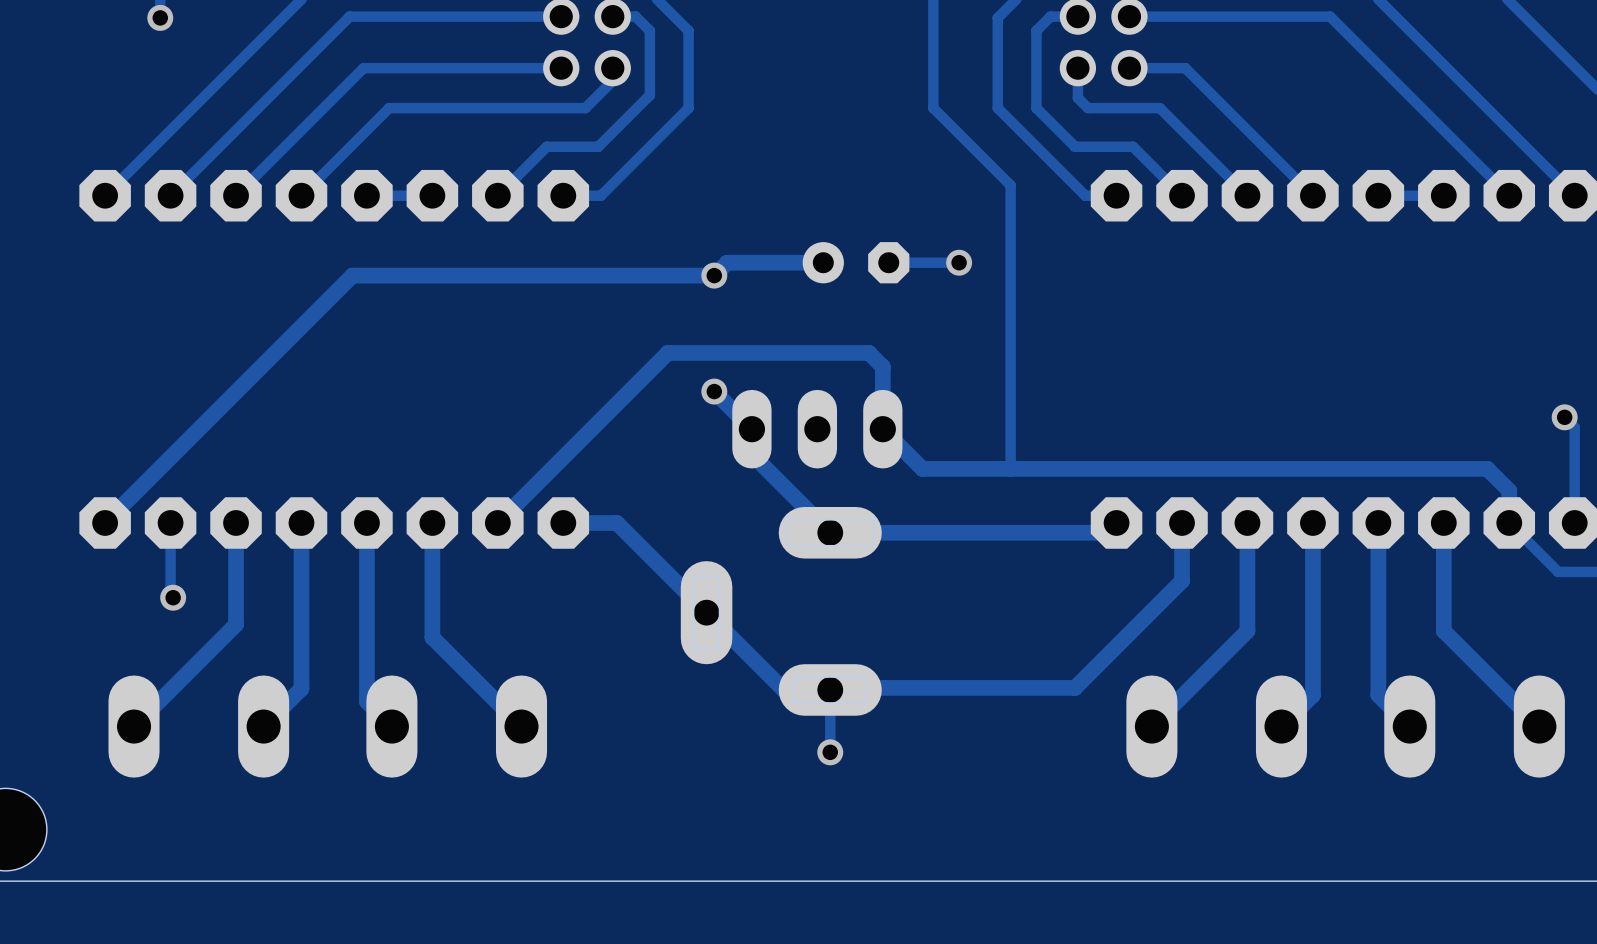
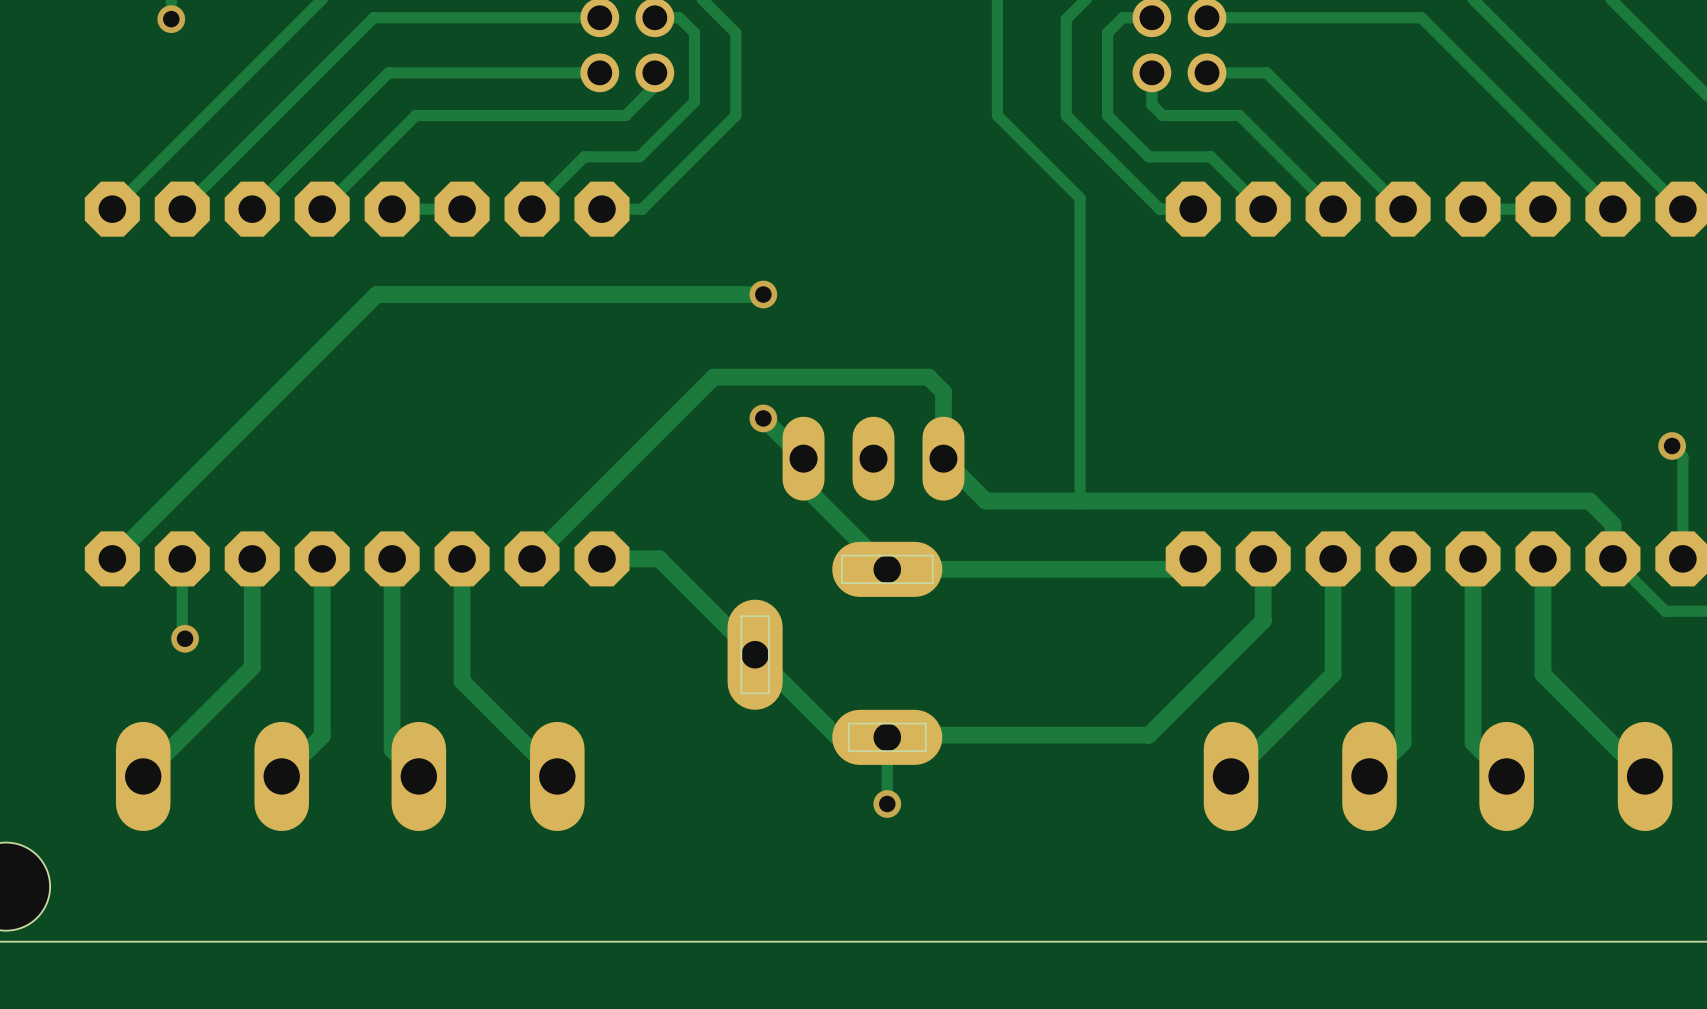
track: (823, 262) (727, 262) (714, 275) -> none
part: (856, 262) -> none
track: (959, 262) (888, 262) -> none
via: (959, 262) -> none

